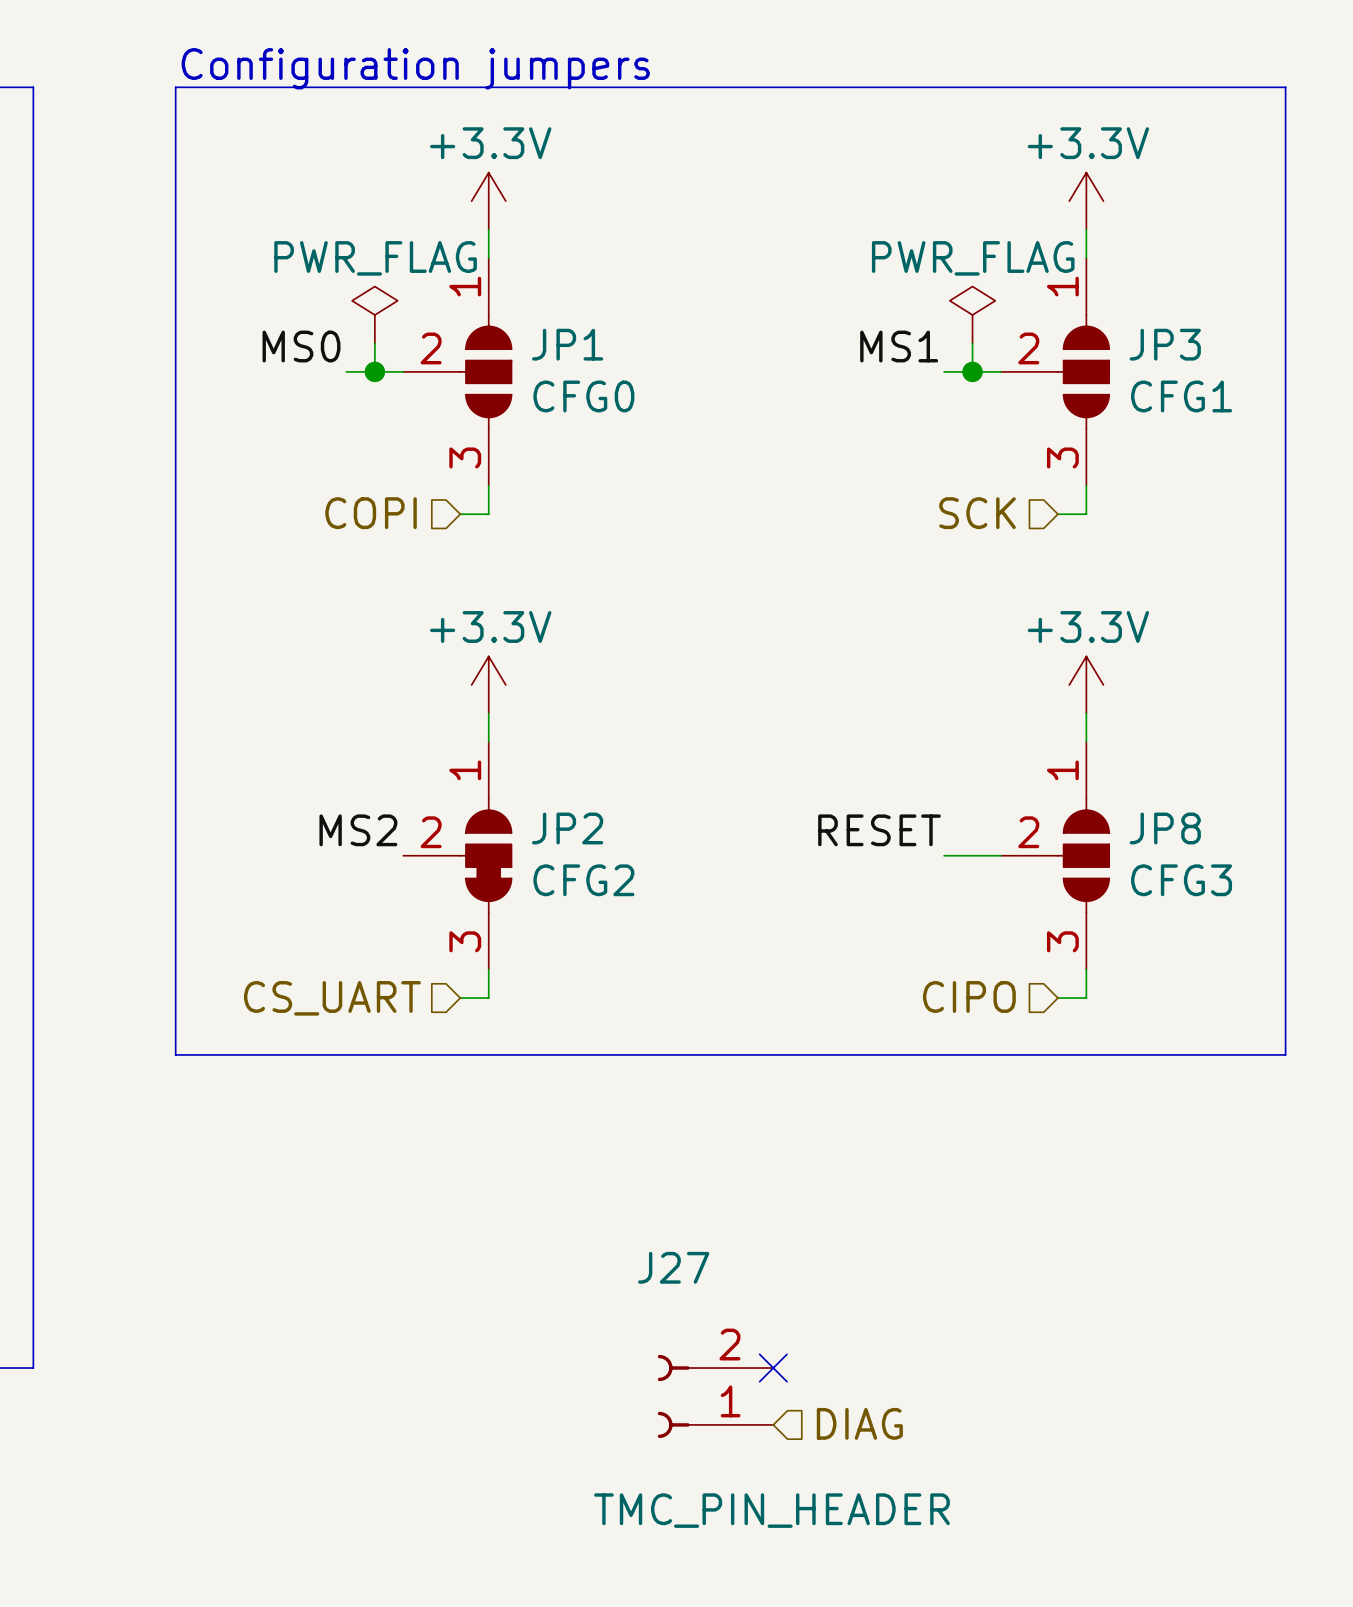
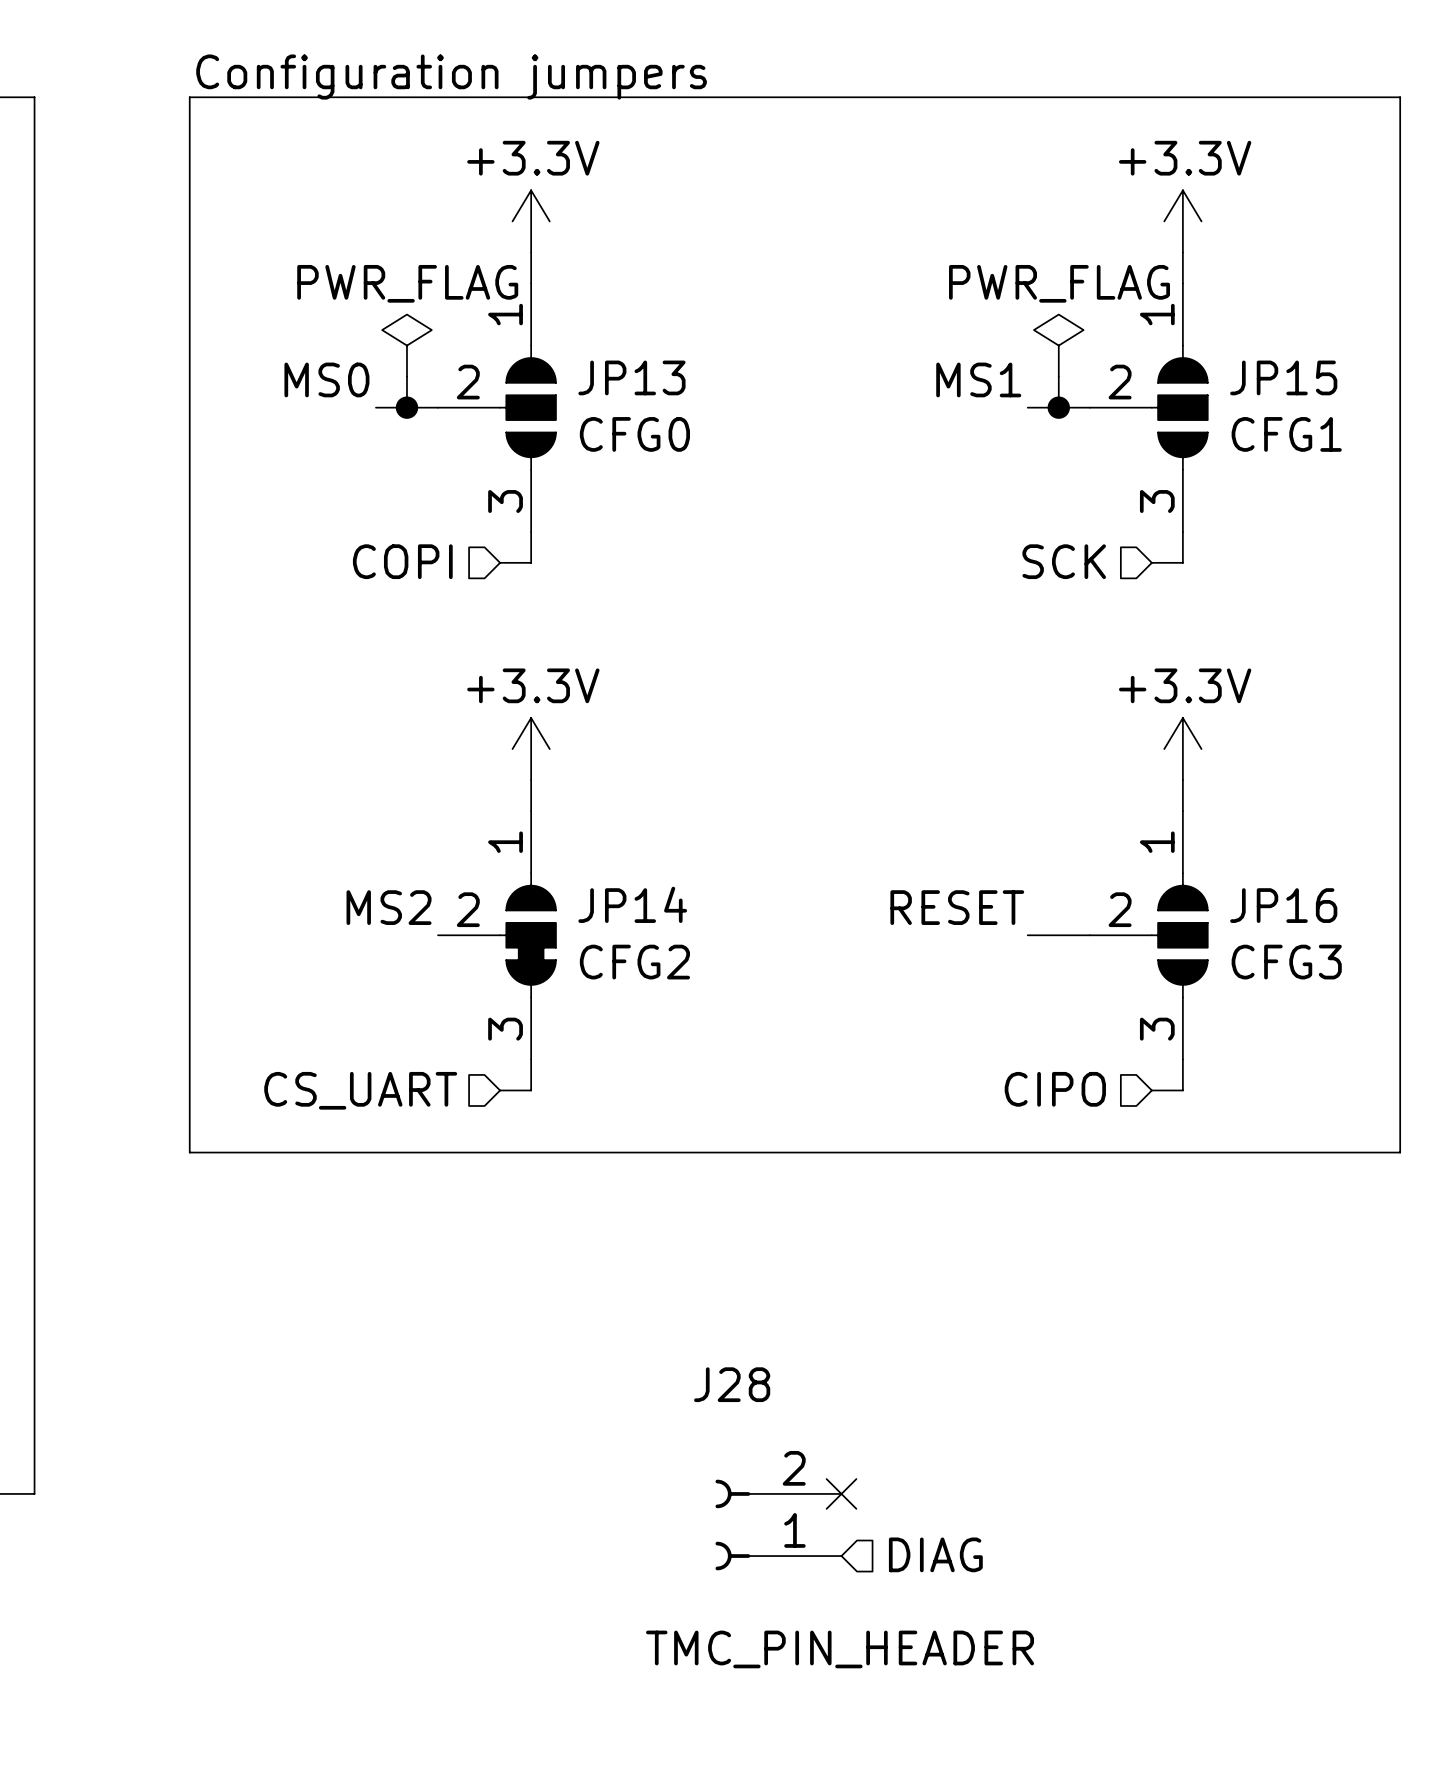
JP1 name: JP1 (567, 344) -> JP13 (631, 377)
JP3 name: JP3 (1165, 344) -> JP15 (1283, 377)
JP2 name: JP2 (567, 828) -> JP14 (632, 904)
JP8 name: JP8 (1165, 828) -> JP16 (1283, 905)
J27 name: J27 (673, 1267) -> J28 (732, 1384)

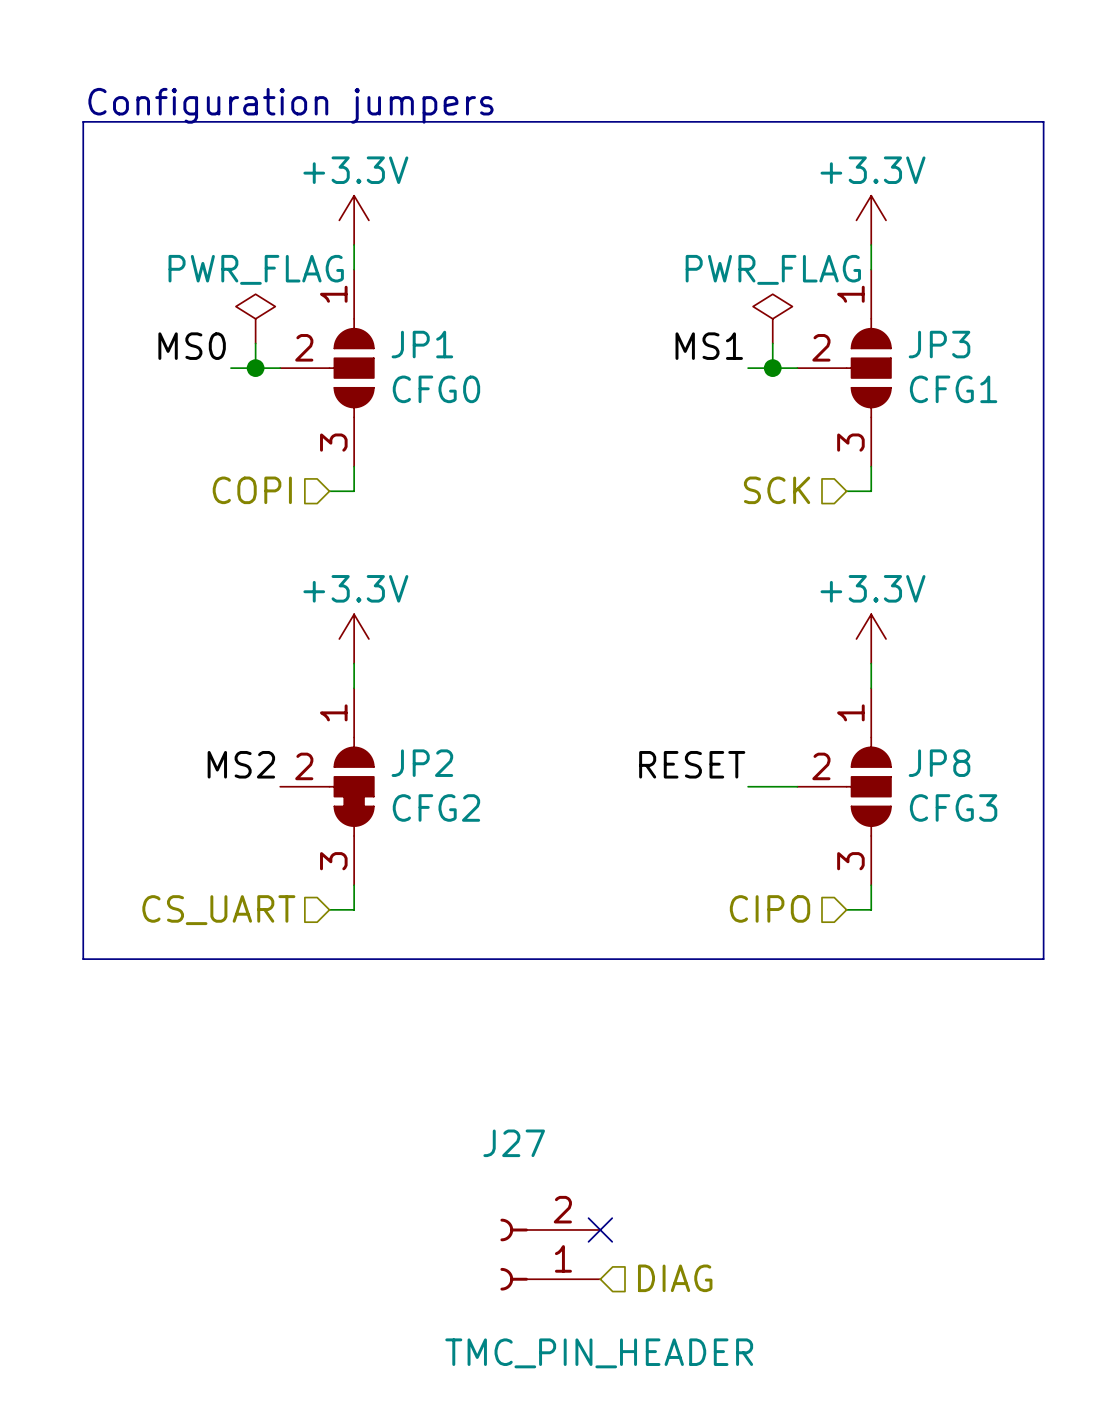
JP13 name: JP13 (631, 377) -> JP1 (422, 344)
JP15 name: JP15 (1283, 377) -> JP3 (939, 344)
JP14 name: JP14 (632, 904) -> JP2 (422, 763)
JP16 name: JP16 (1283, 905) -> JP8 (939, 763)
J28 name: J28 (732, 1384) -> J27 (514, 1143)

